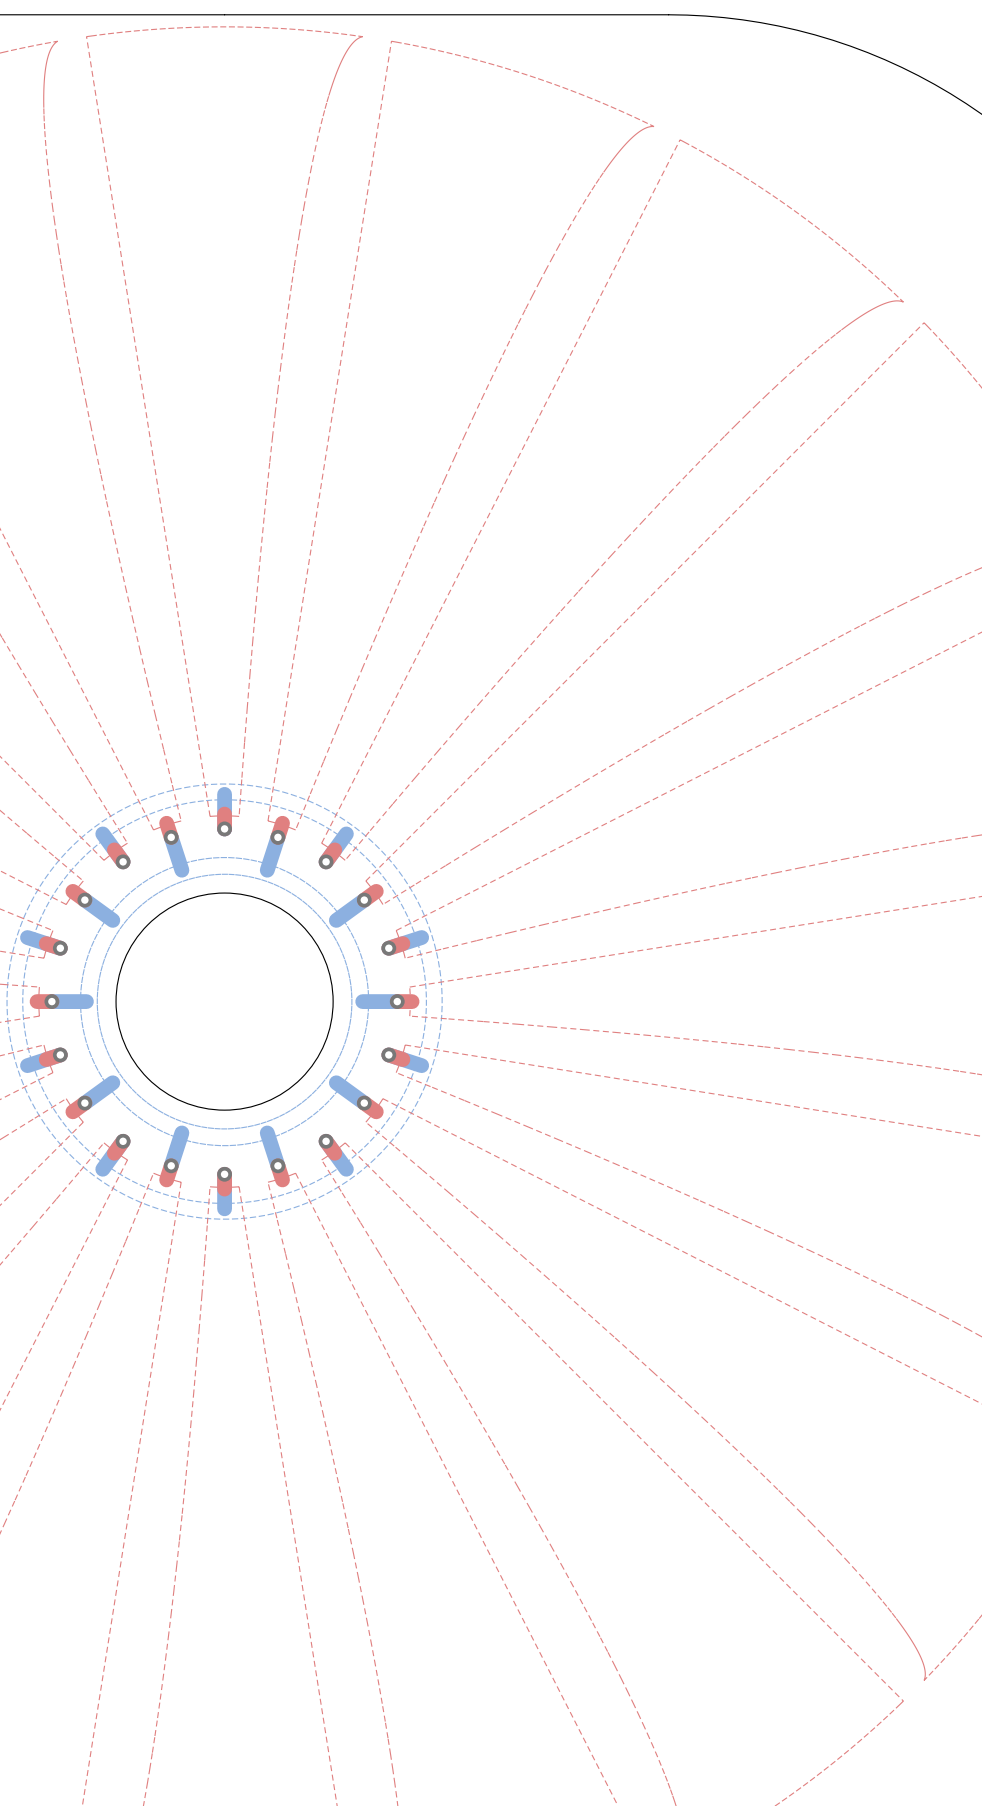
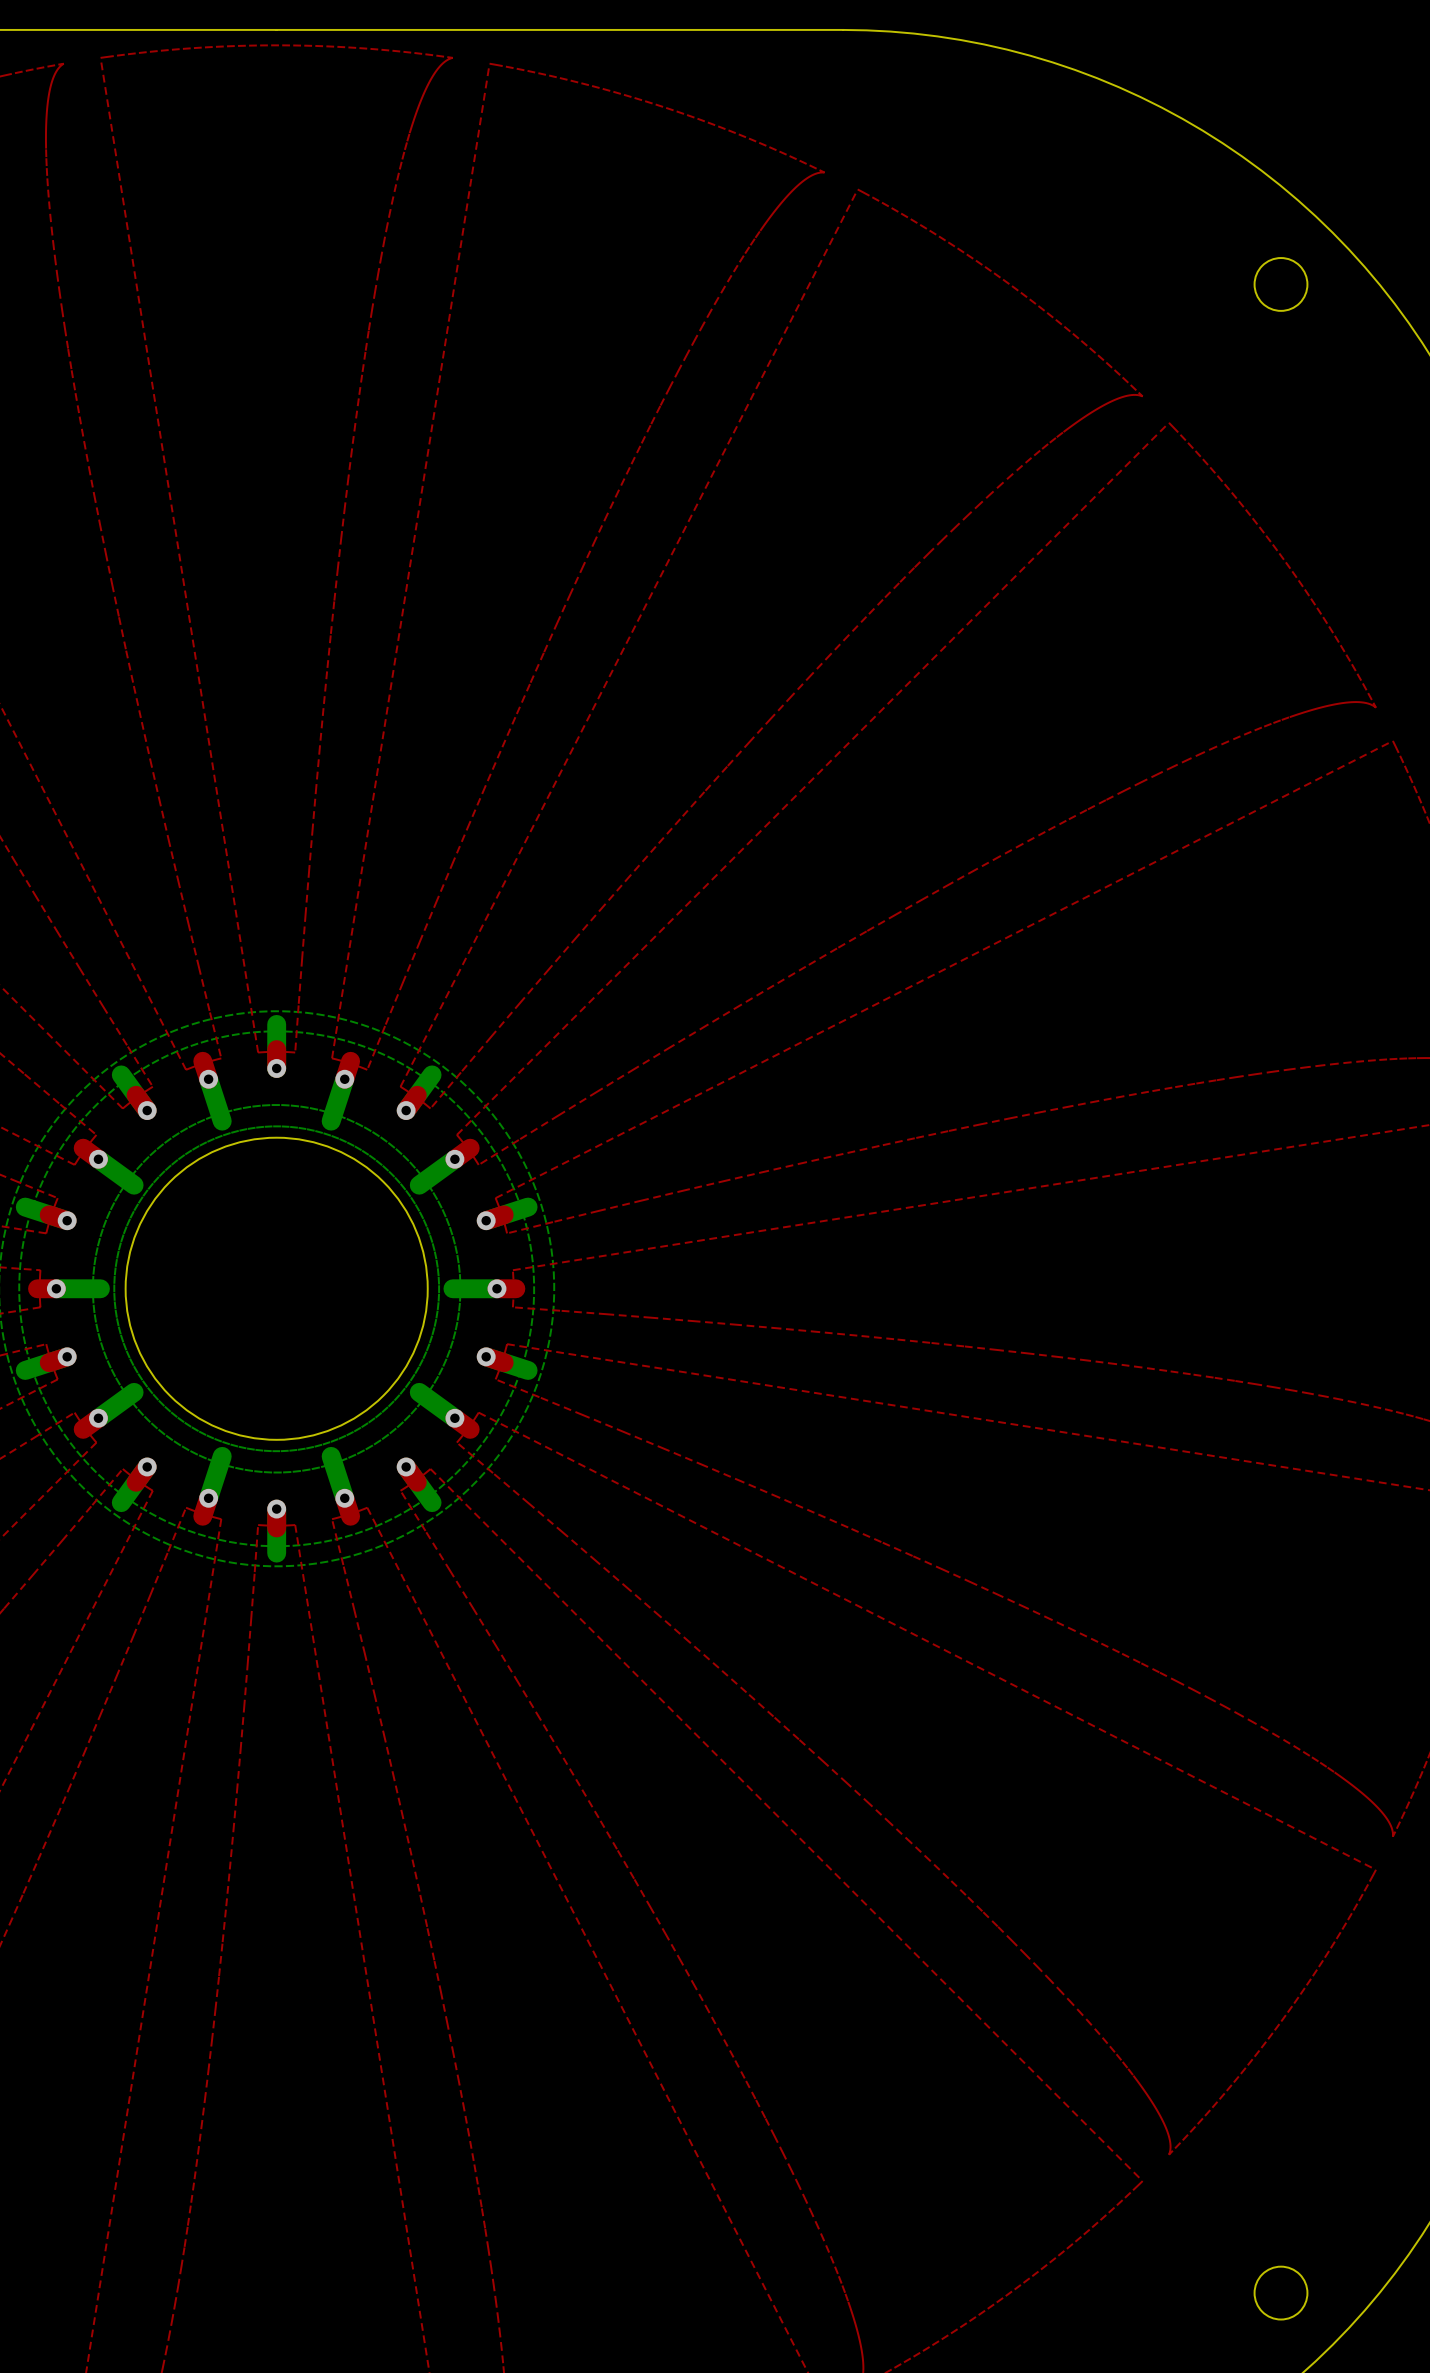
round board edge size: [115, 892, 334, 1111] -> [125, 1137, 429, 1441]

